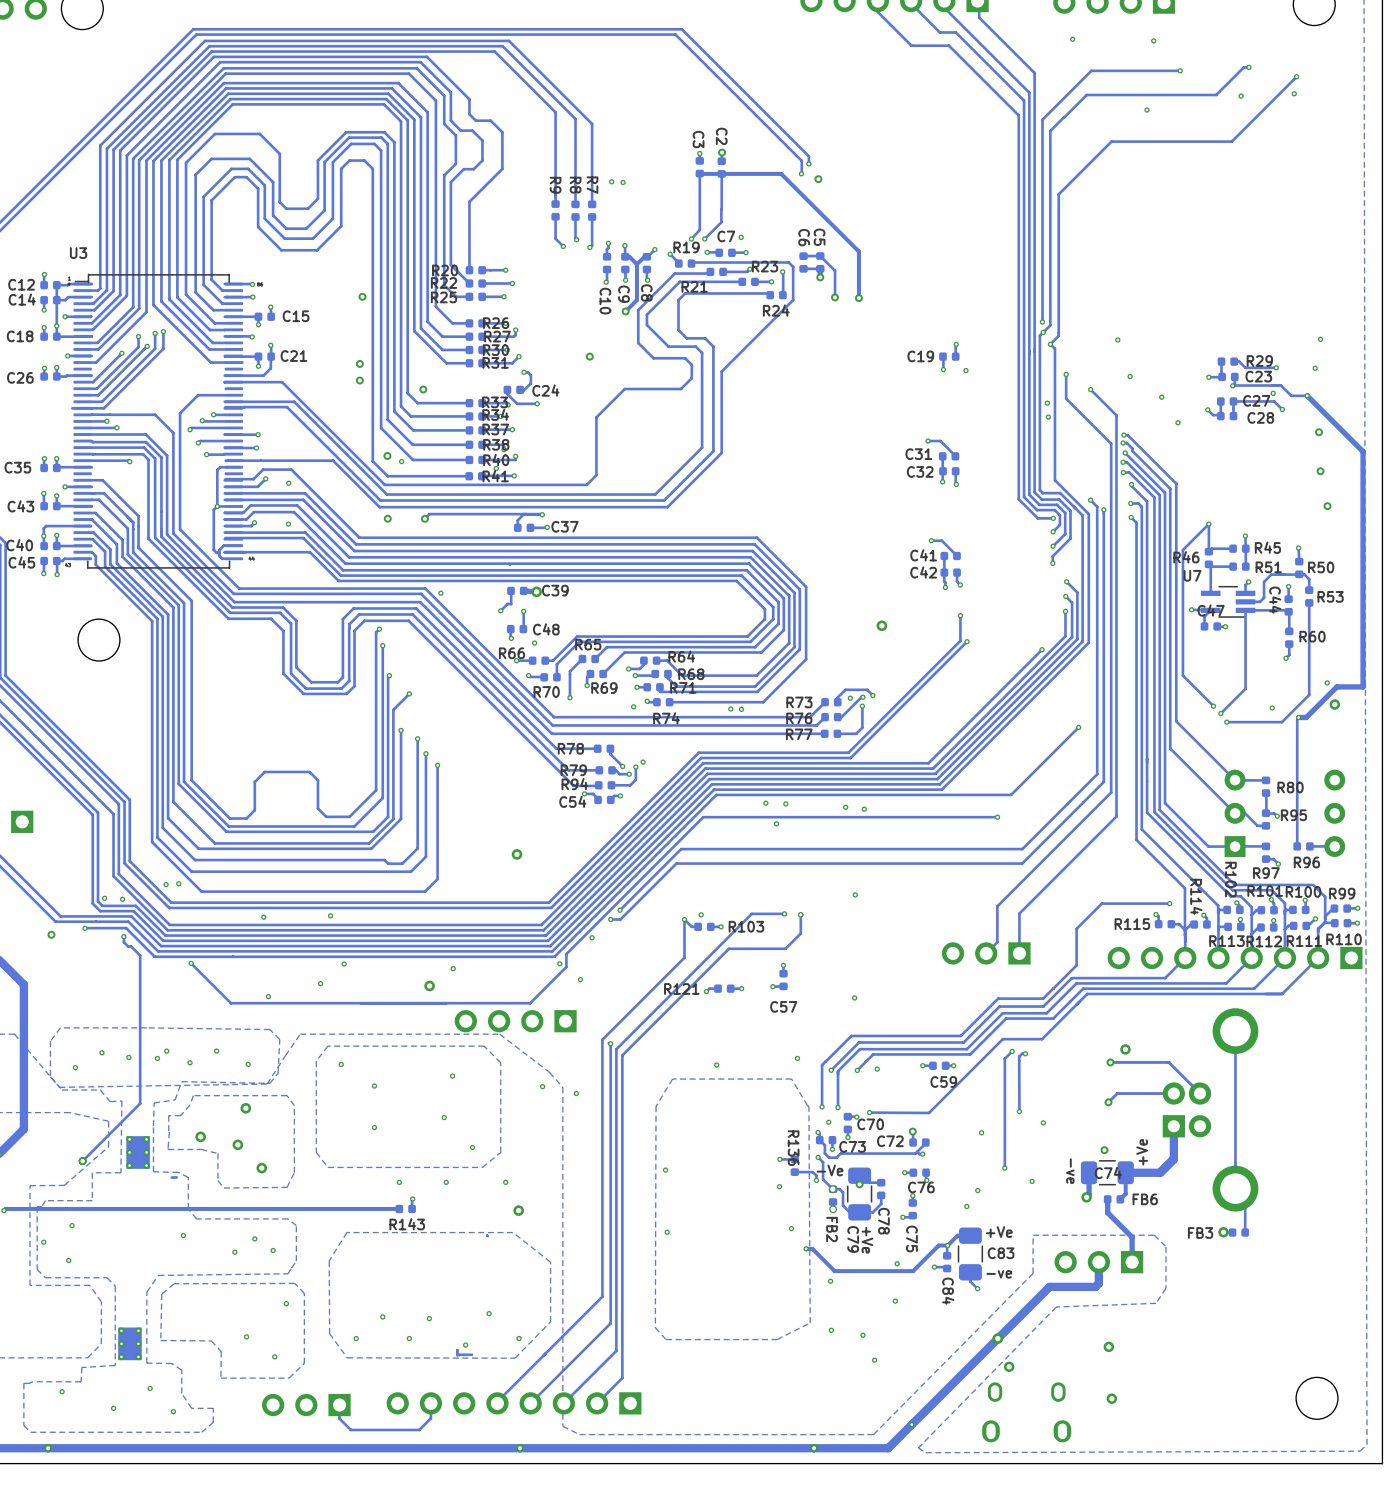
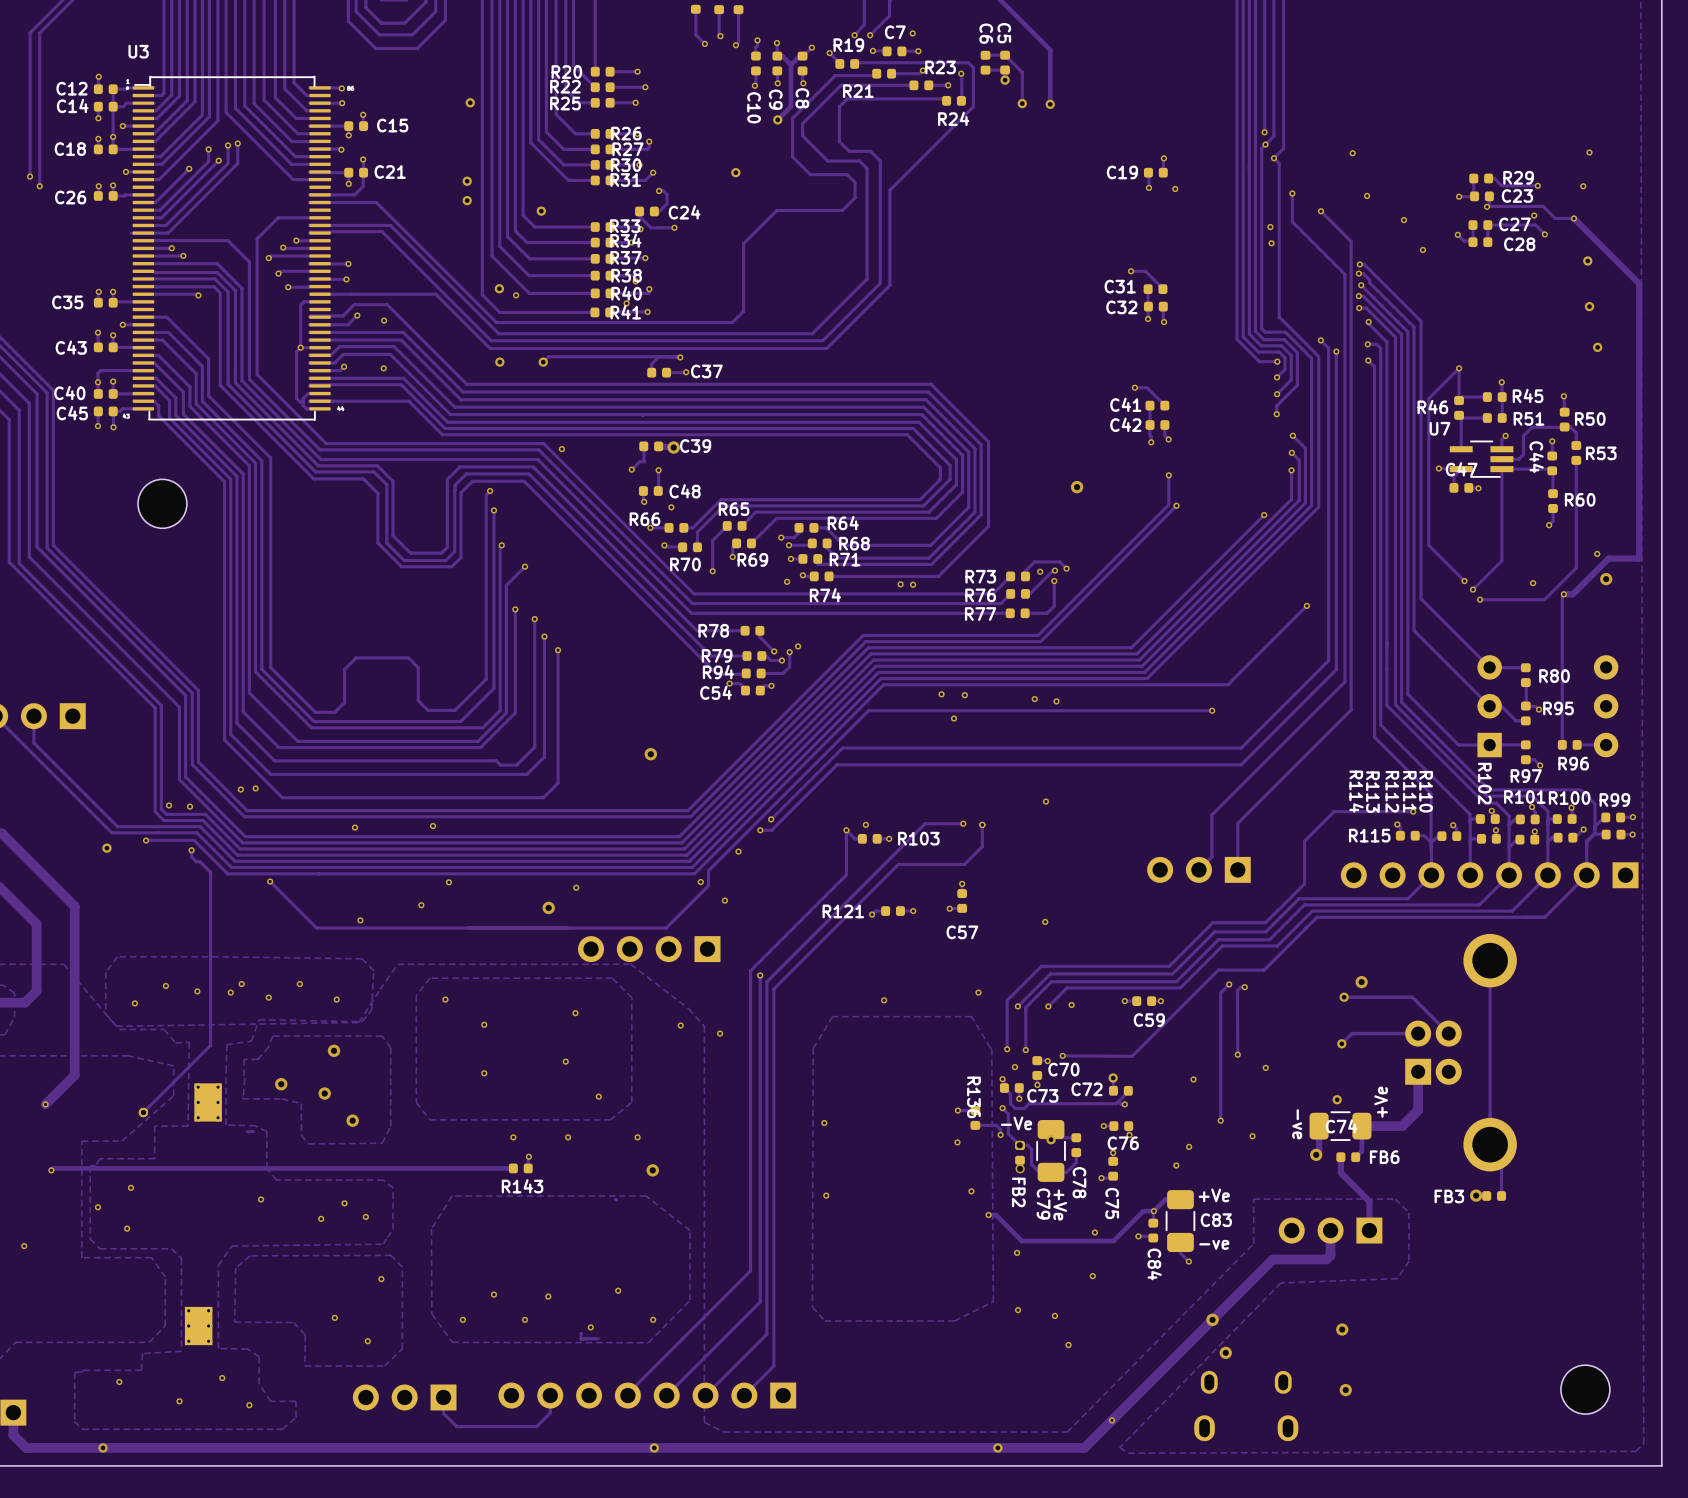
R114 name position: R114 (1196, 896) -> R114 (1356, 791)
R110 name rotation: 0° (1344, 939) -> 90° clockwise (1426, 791)
R110 name position: R110 (1344, 939) -> R110 (1426, 791)
R113 name rotation: 0° (1226, 941) -> 90° clockwise (1372, 792)
R113 name position: R113 (1226, 941) -> R113 (1372, 792)
R112 name rotation: 0° (1264, 941) -> 90° clockwise (1392, 791)
R112 name position: R112 (1264, 941) -> R112 (1392, 791)
R111 name rotation: 0° (1304, 941) -> 90° clockwise (1409, 791)
R111 name position: R111 (1304, 941) -> R111 (1409, 791)

